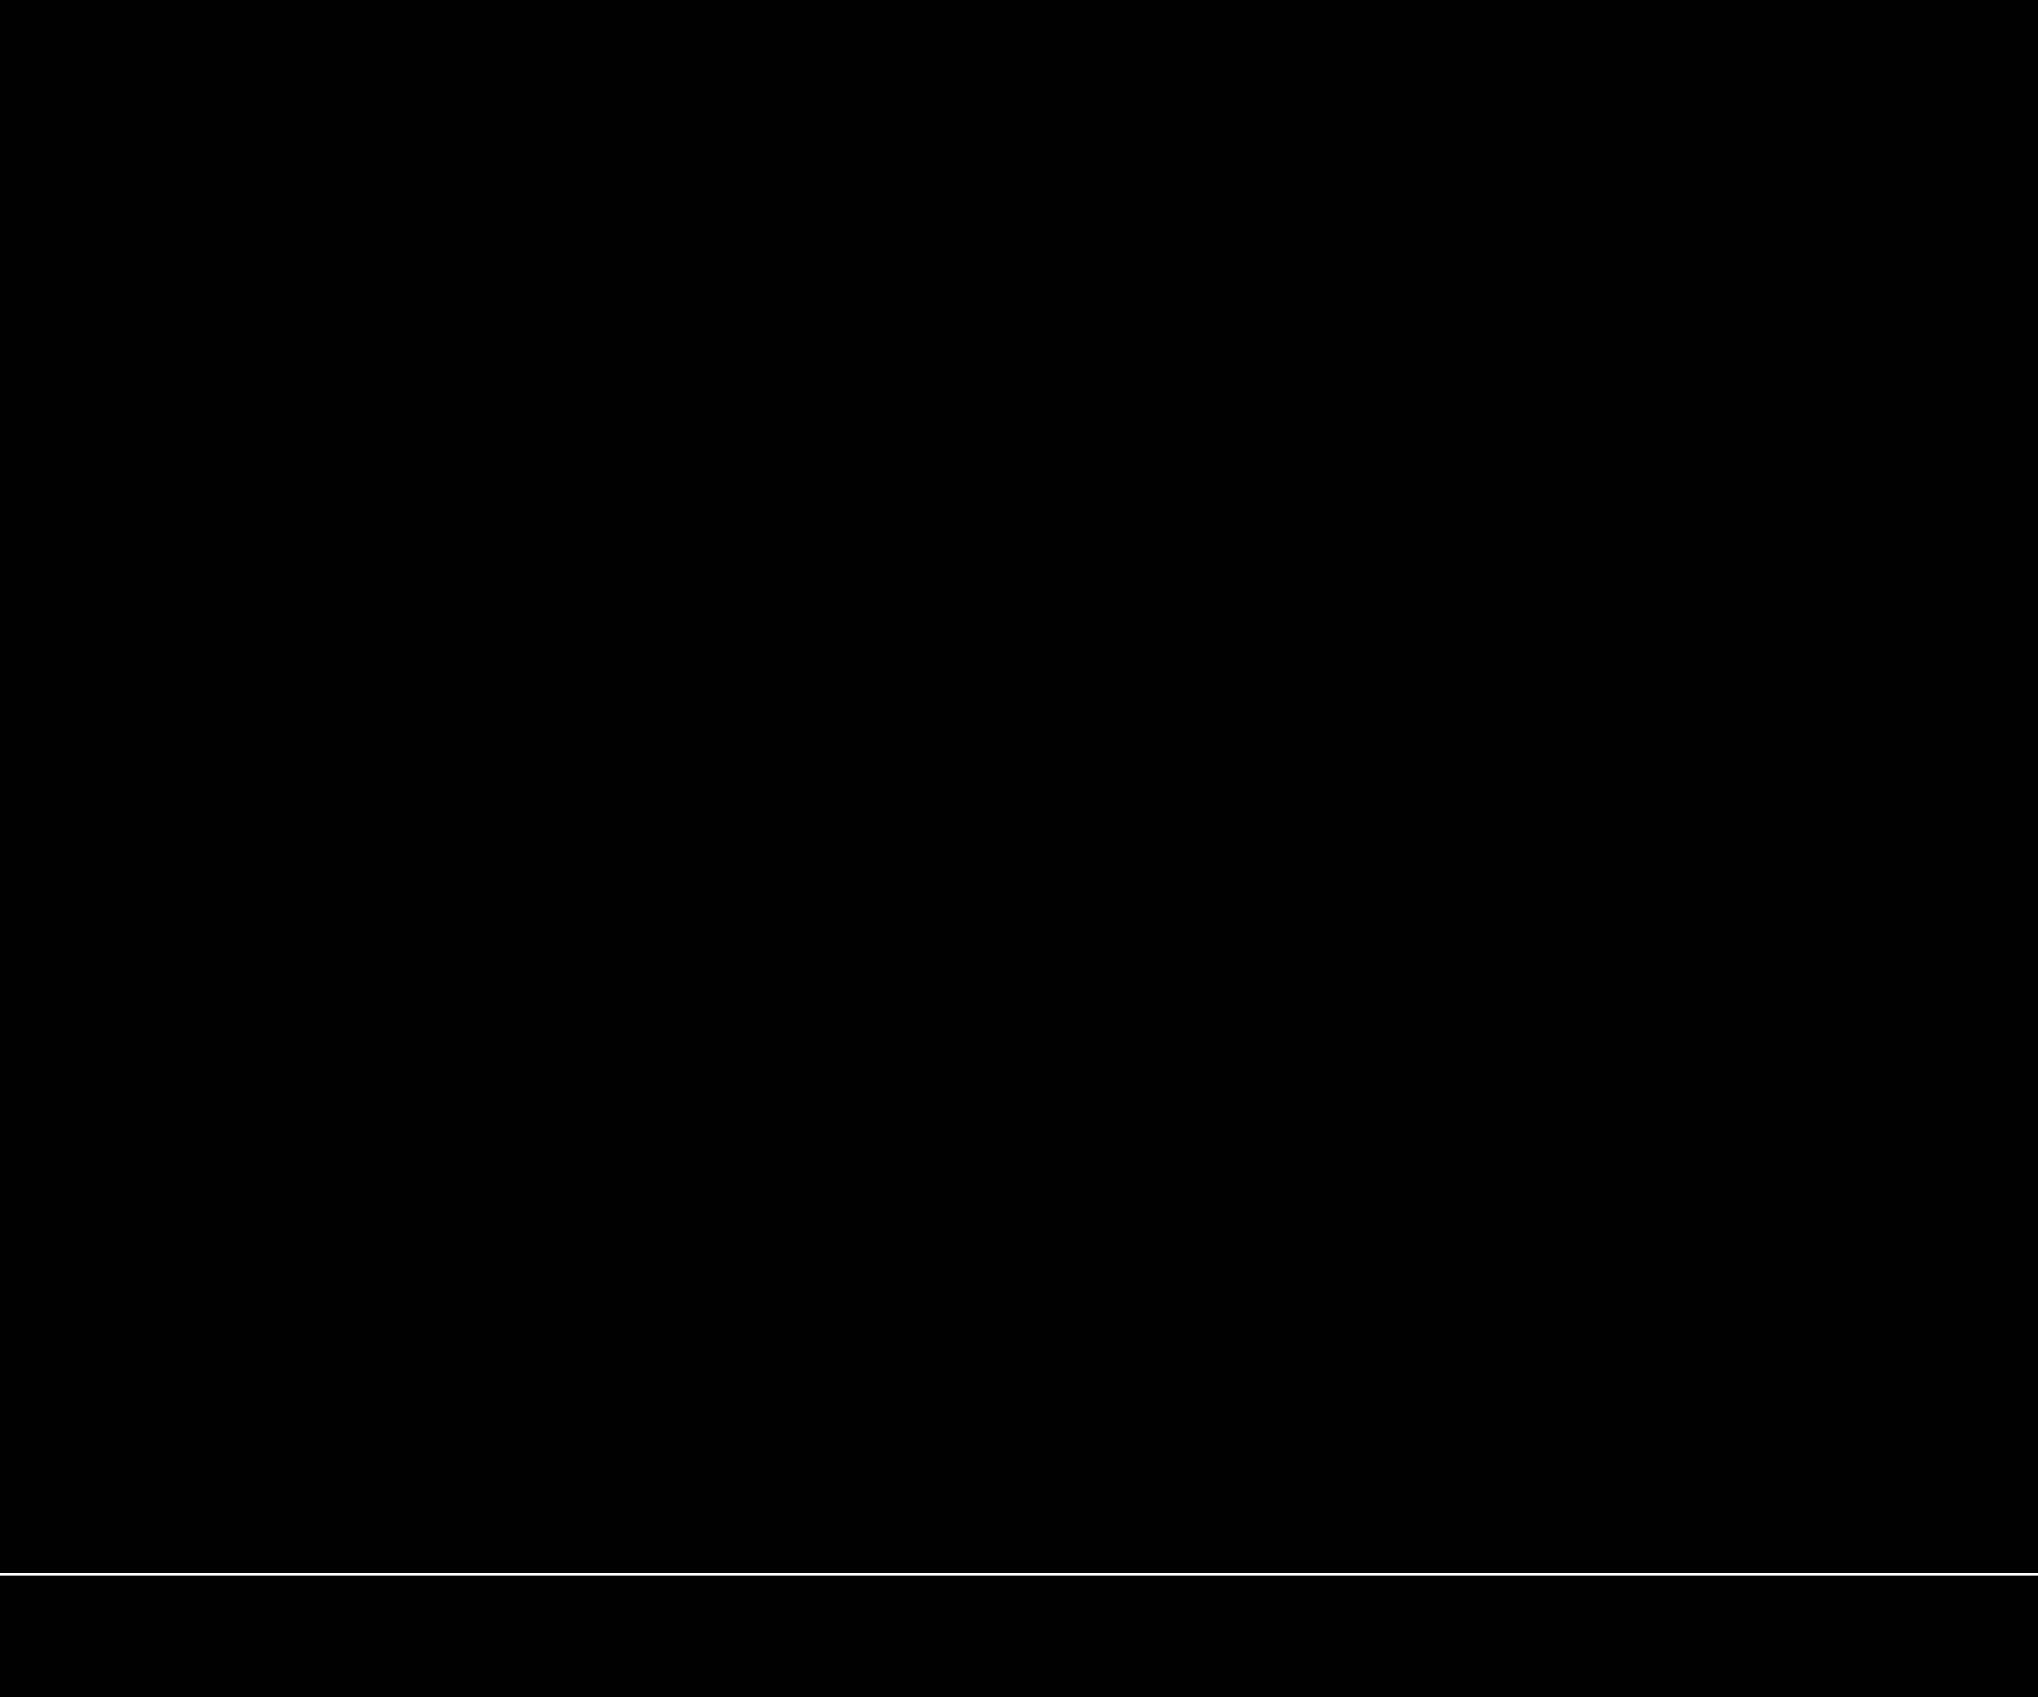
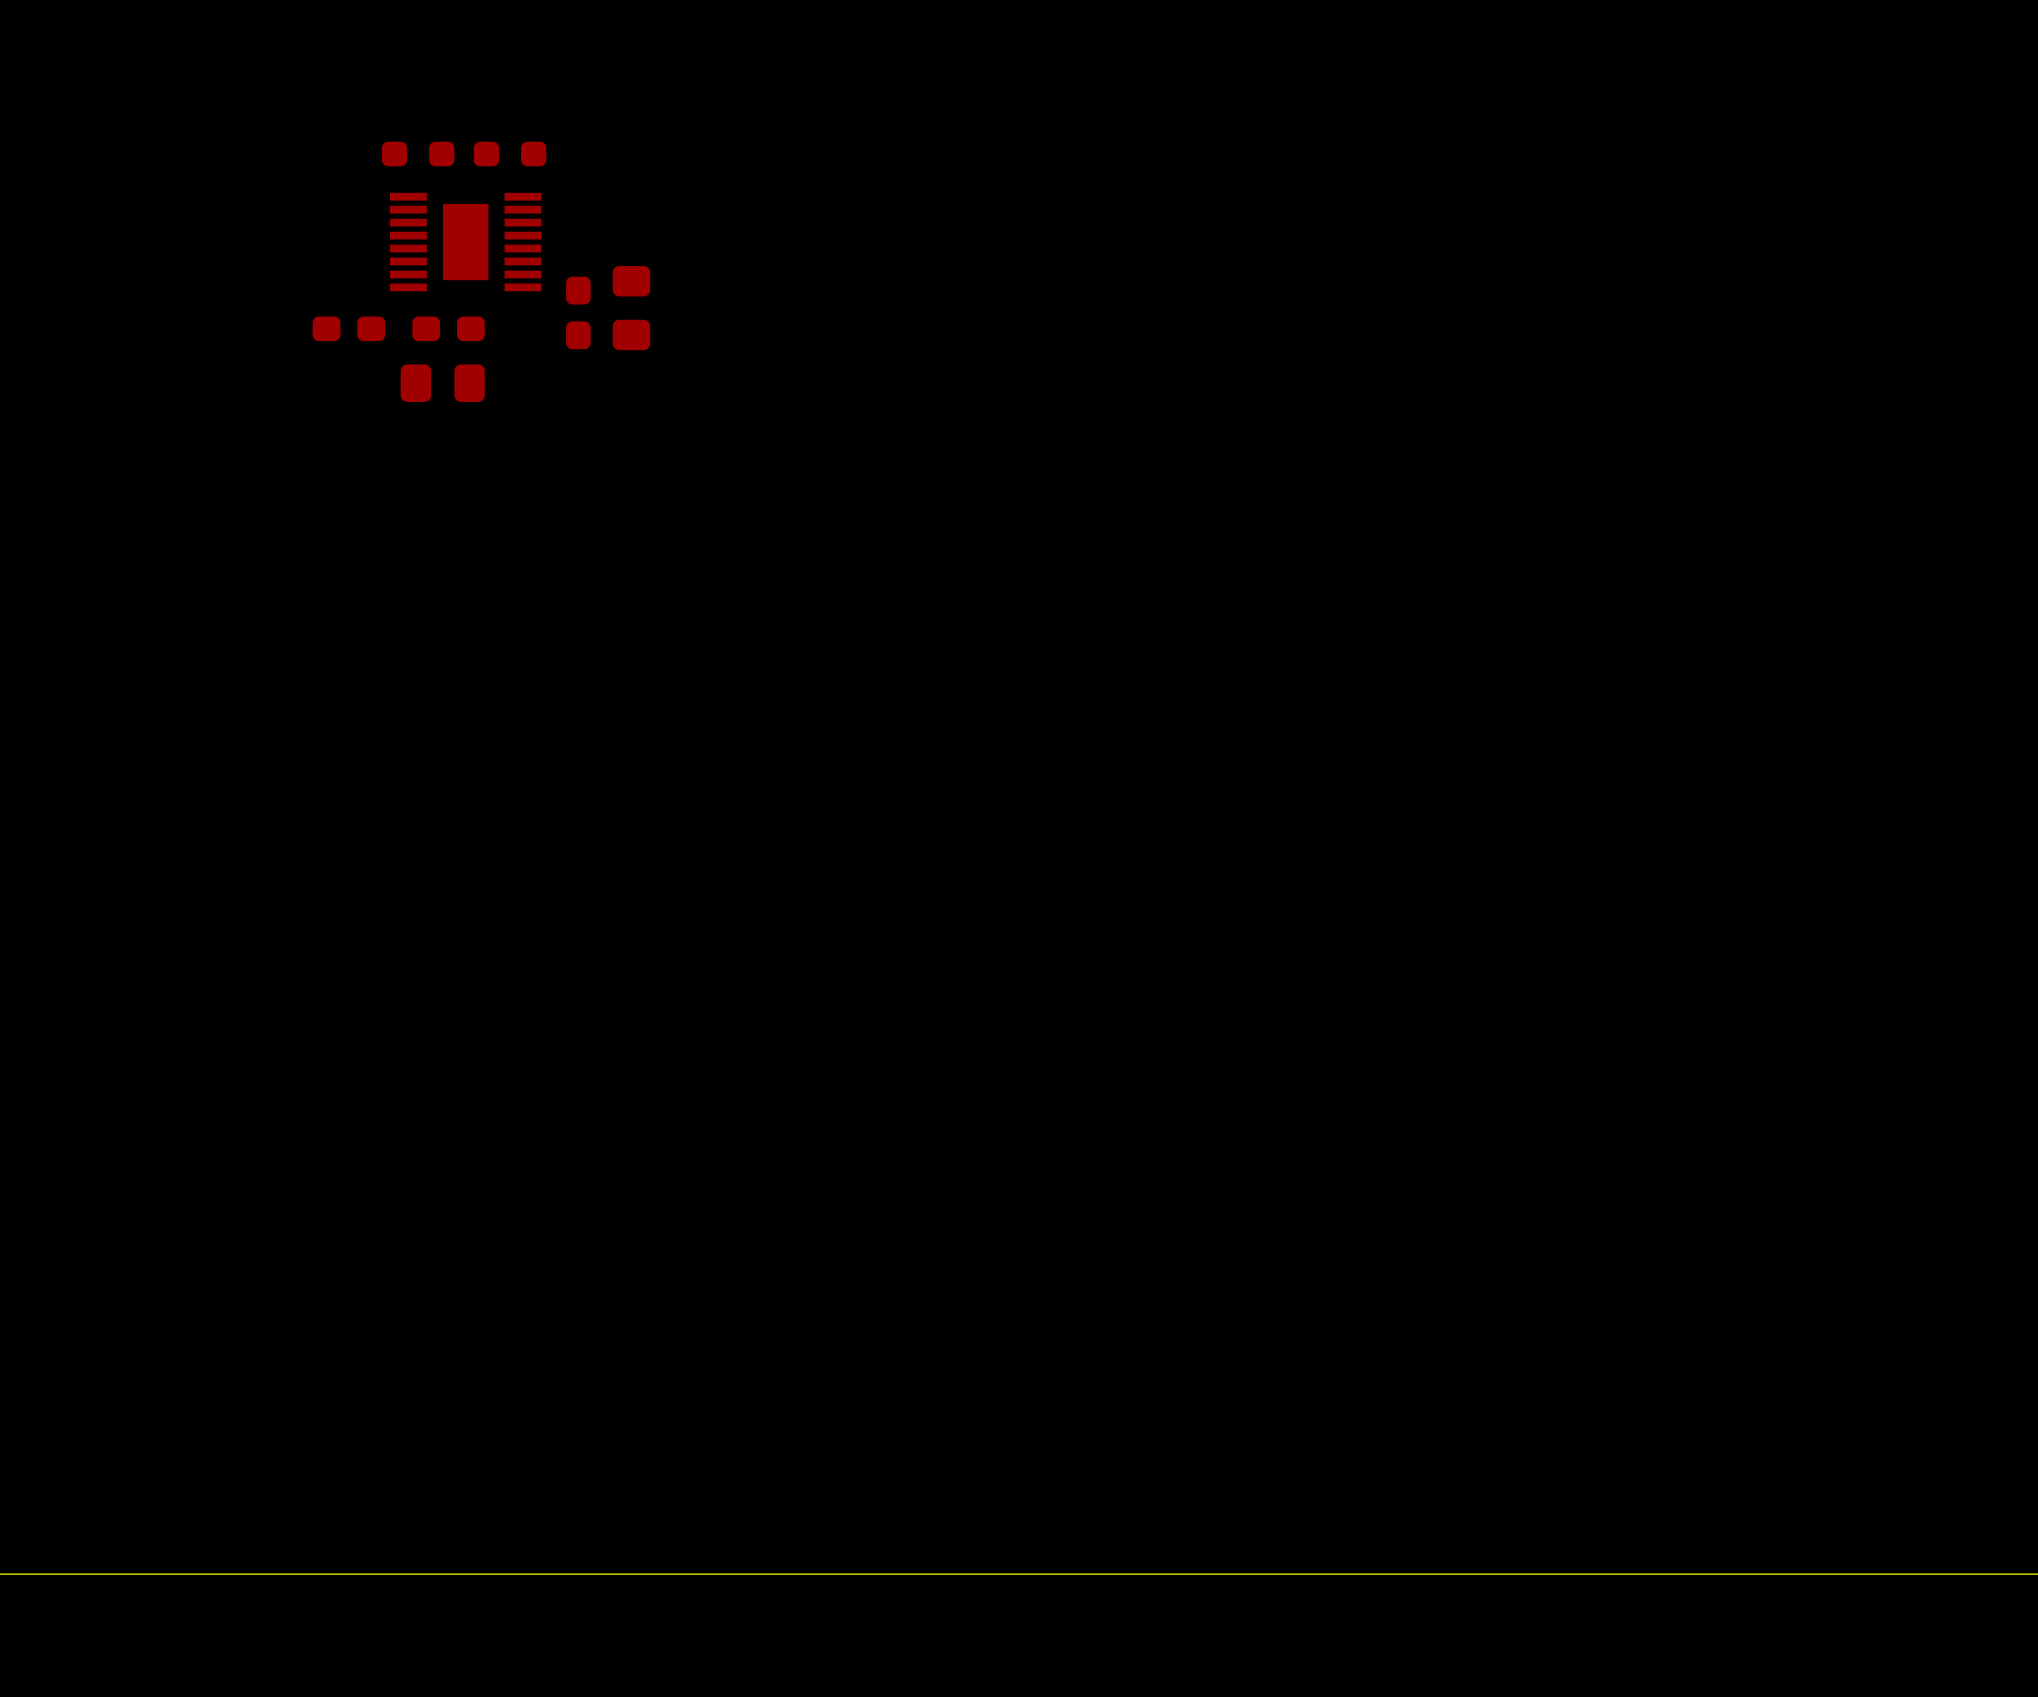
part: none -> (418, 154)
part: none -> (510, 154)
part: none -> (465, 242)
part: none -> (631, 308)
part: none -> (578, 312)
part: none -> (348, 328)
part: none -> (448, 328)
part: none -> (442, 383)

